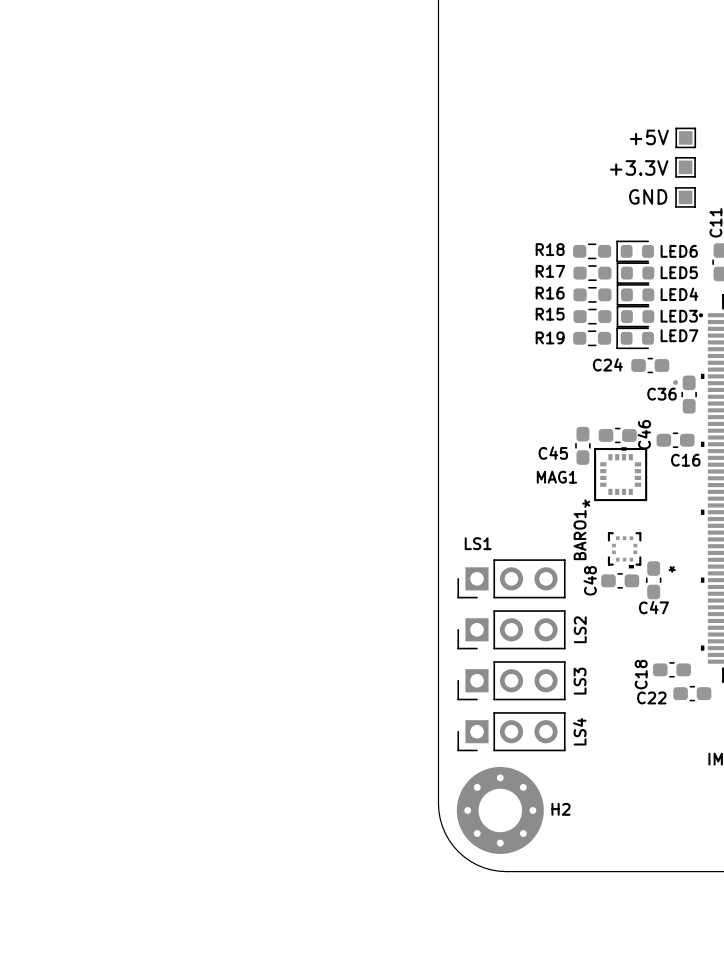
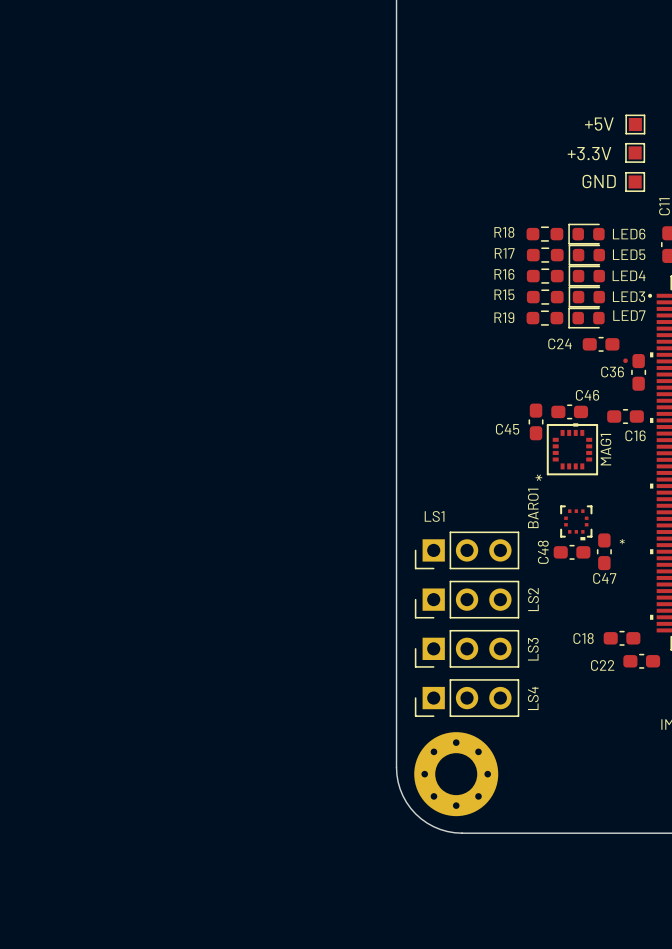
C46 name rotation: 0° (644, 434) -> 90° clockwise (587, 395)
MAG1 name rotation: 0° (556, 477) -> 90° counterclockwise (605, 449)
MAG1 name position: MAG1 (556, 477) -> MAG1 (605, 449)
C18 name rotation: 0° (641, 674) -> 90° clockwise (583, 638)
H2 name: H2 (560, 809) -> none

